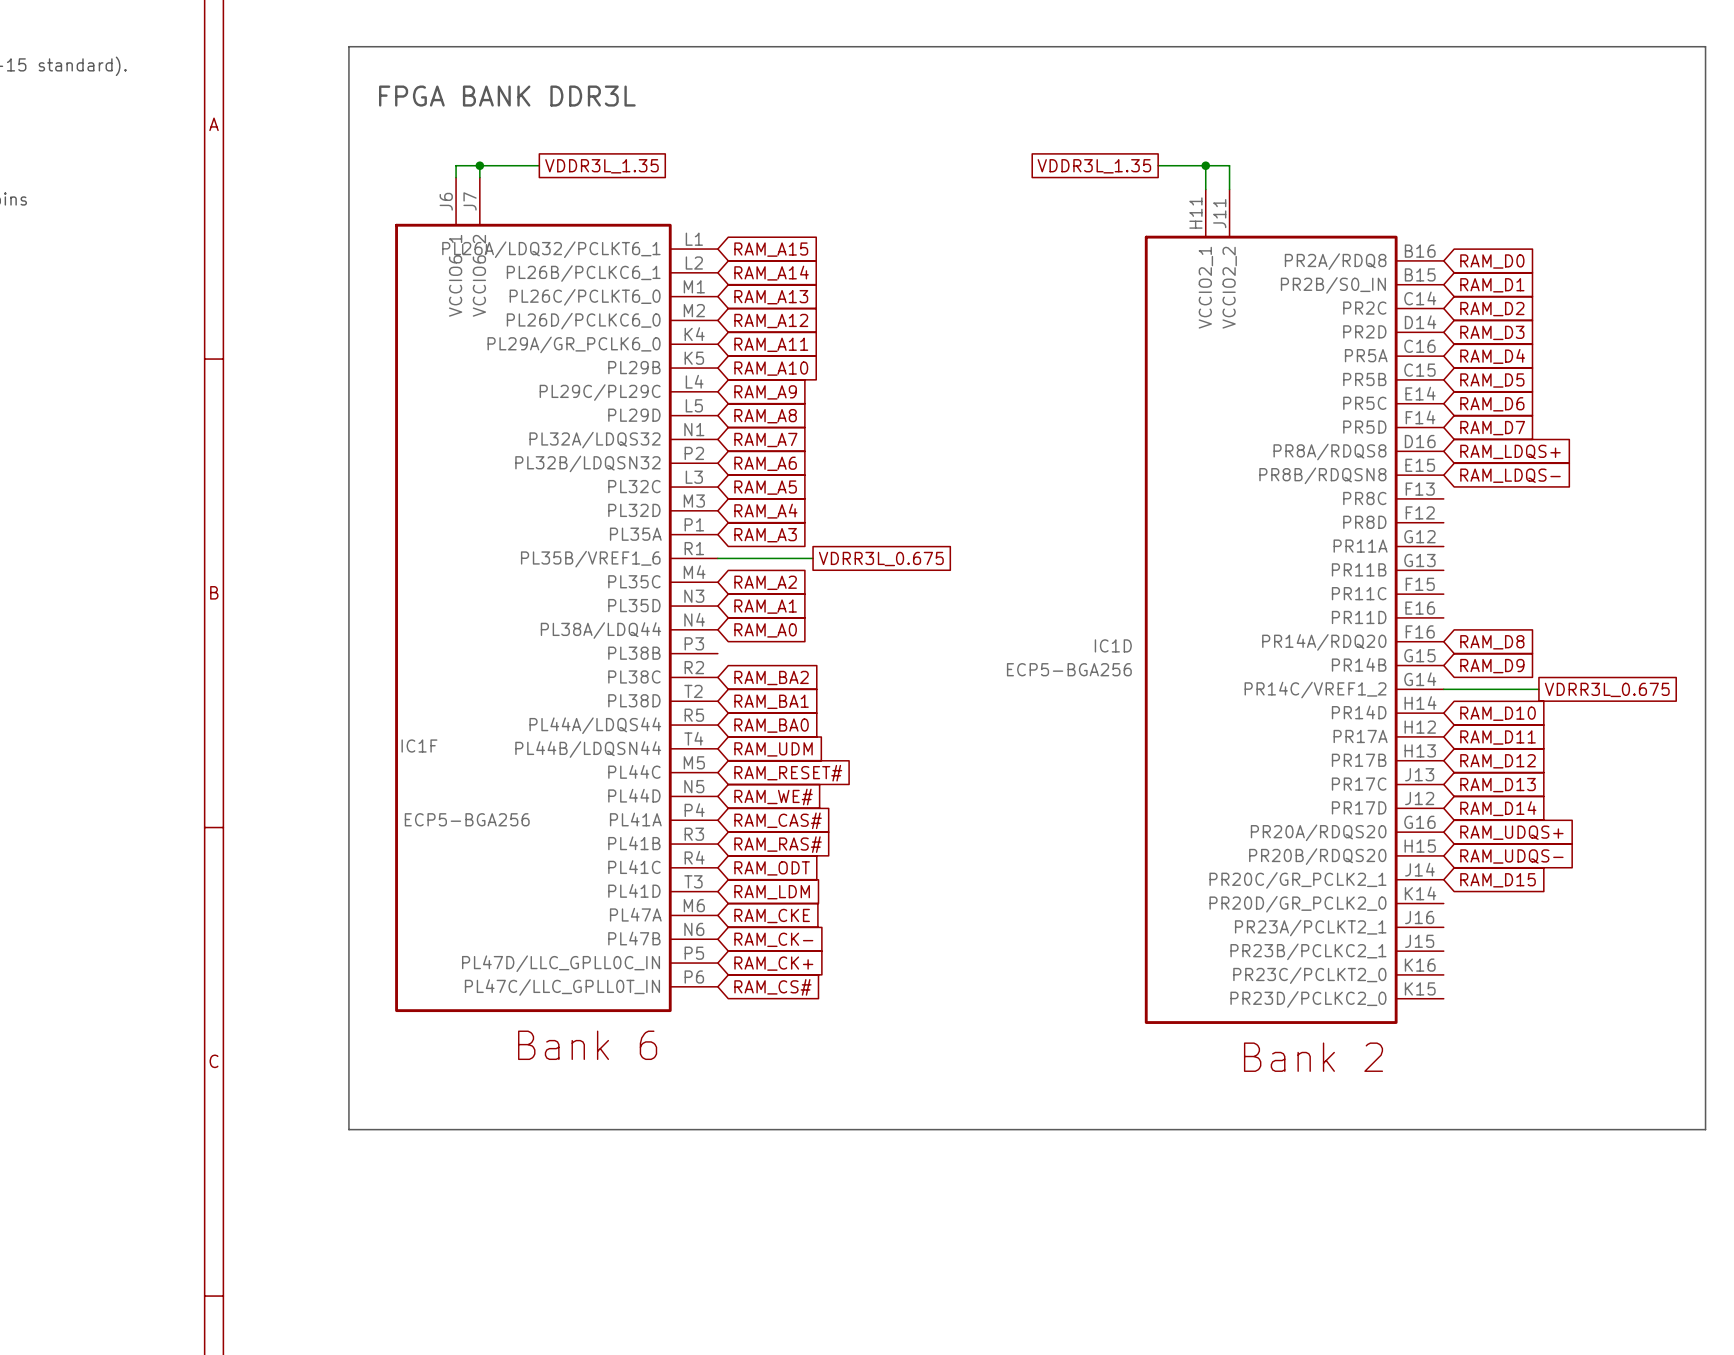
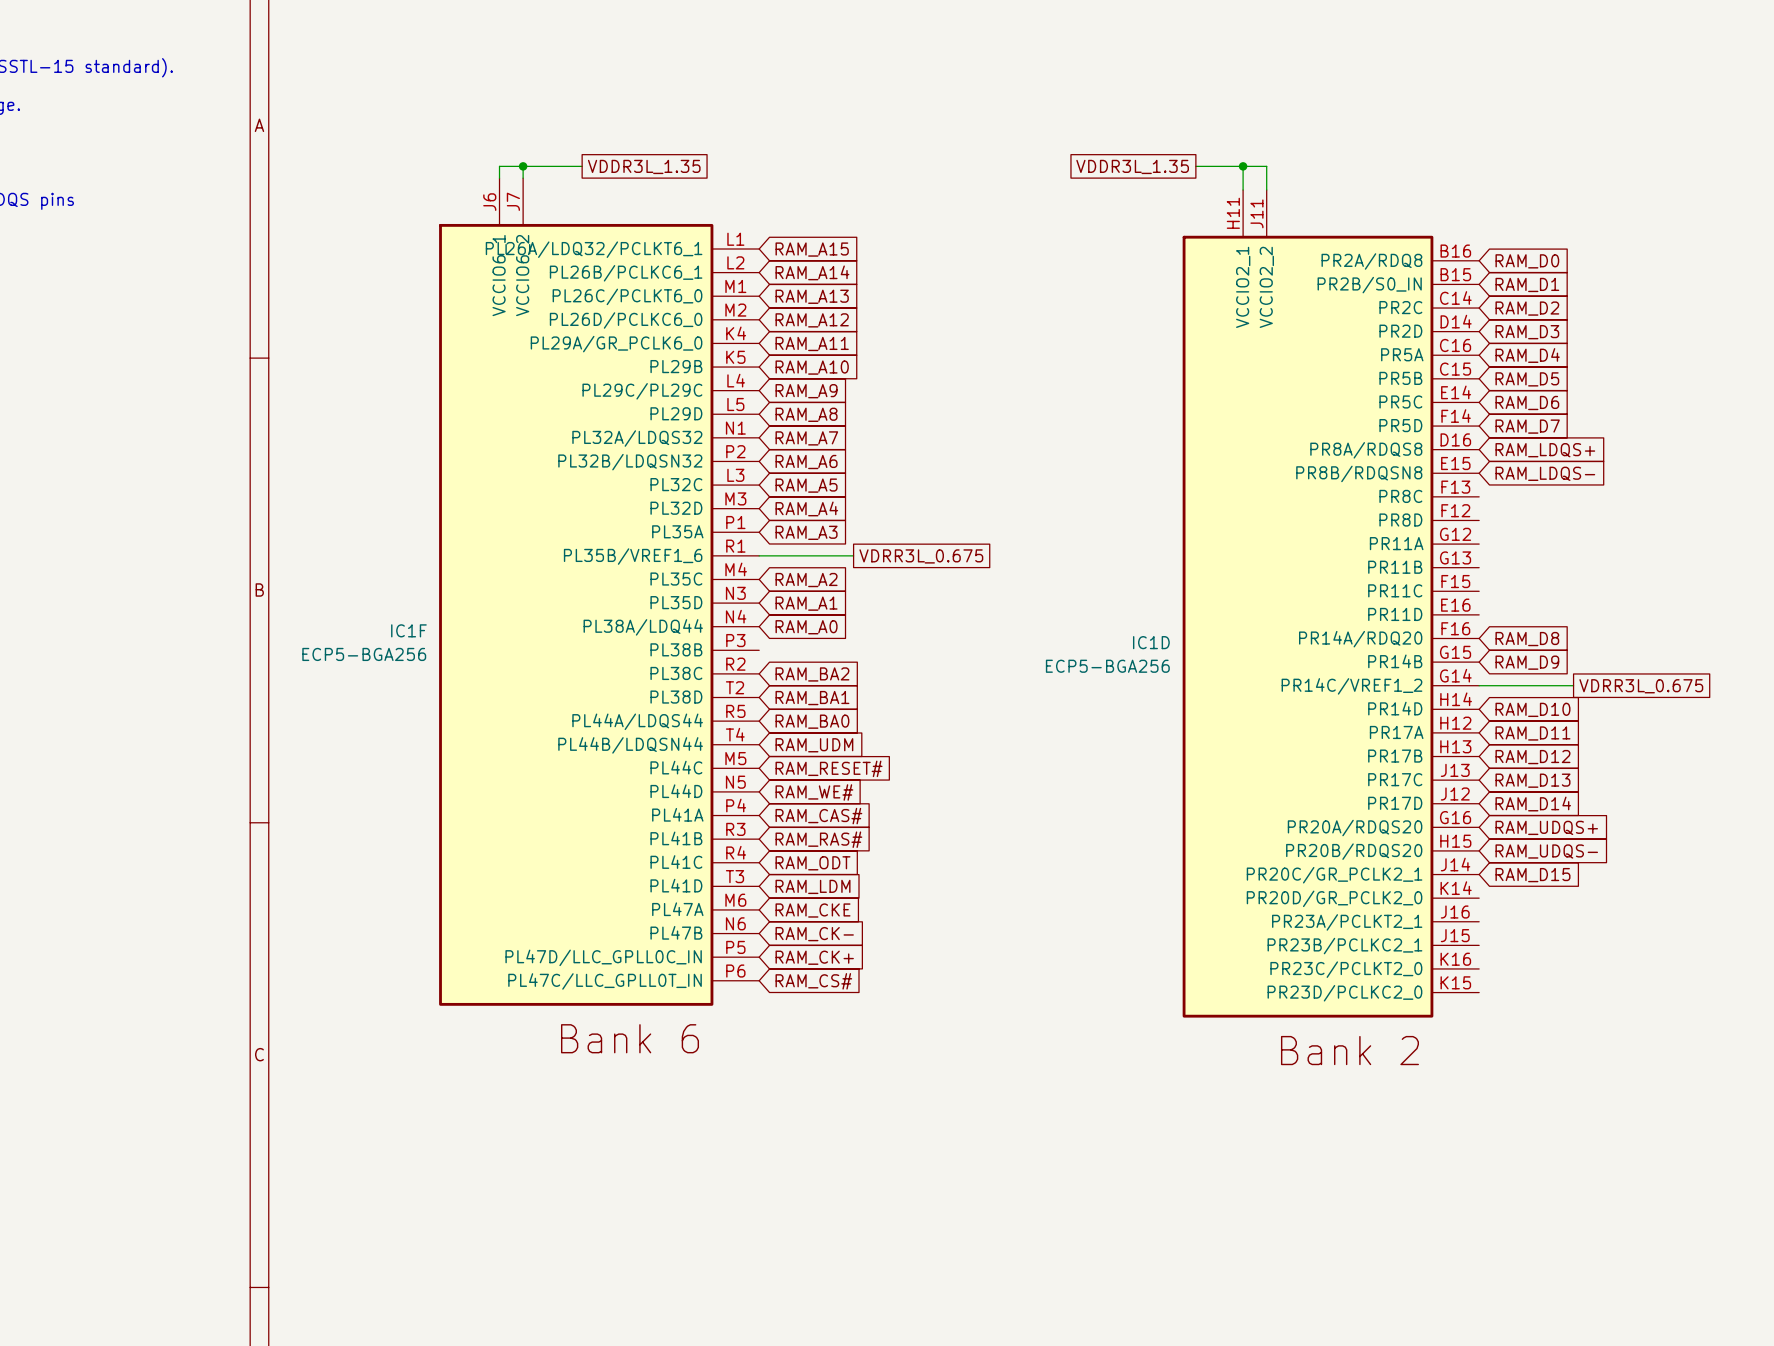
line: (348, 46) (1705, 46) (1705, 1129) (348, 1129) (348, 46) -> none
text: FPGA BANK DDR3L (507, 96) -> none
IC1F name position: IC1F (419, 746) -> IC1F (408, 630)
IC1F value position: ECP5-BGA256 (467, 819) -> ECP5-BGA256 (364, 654)

